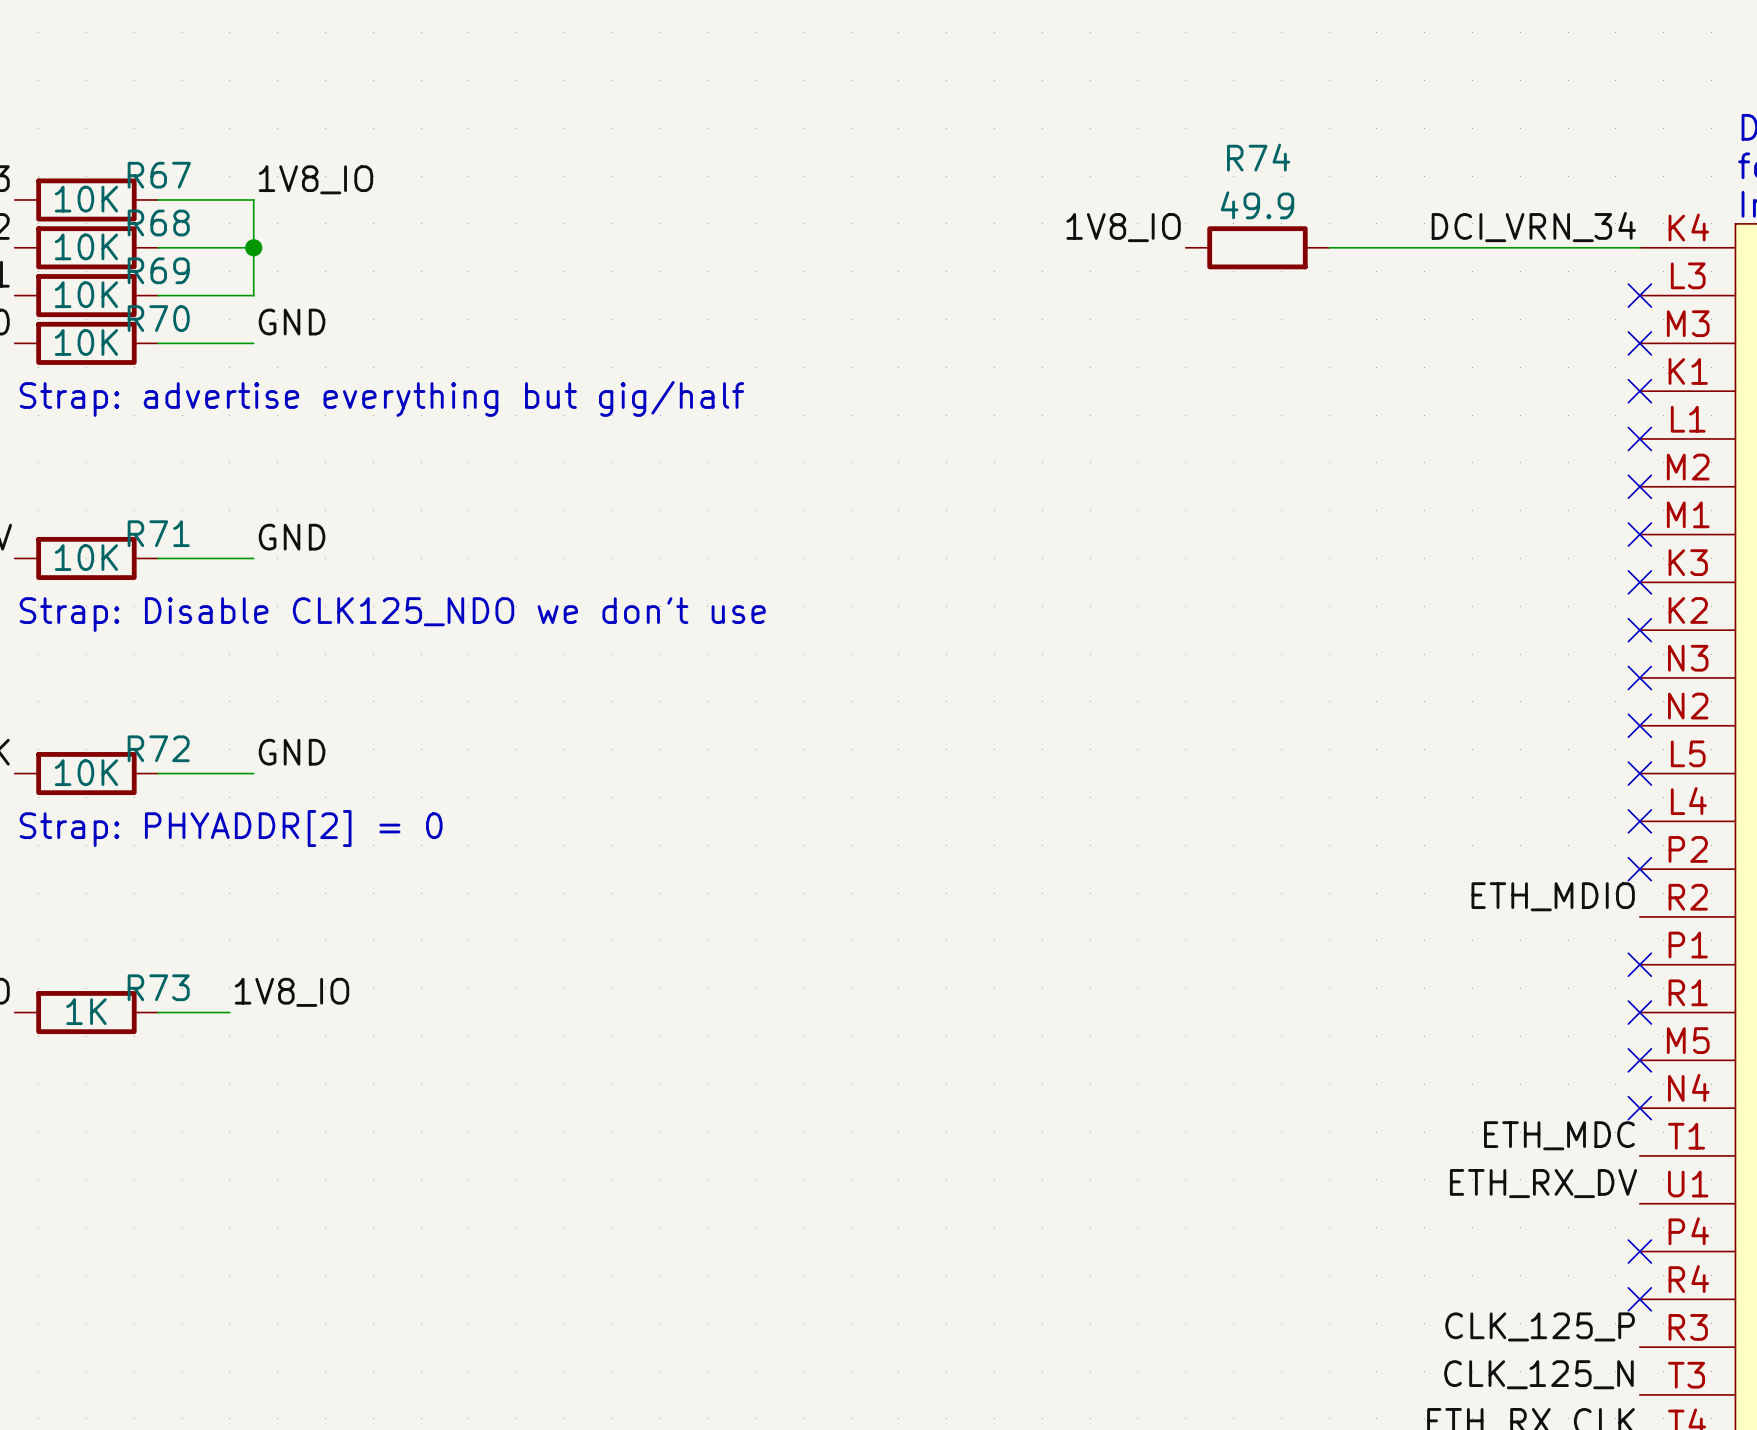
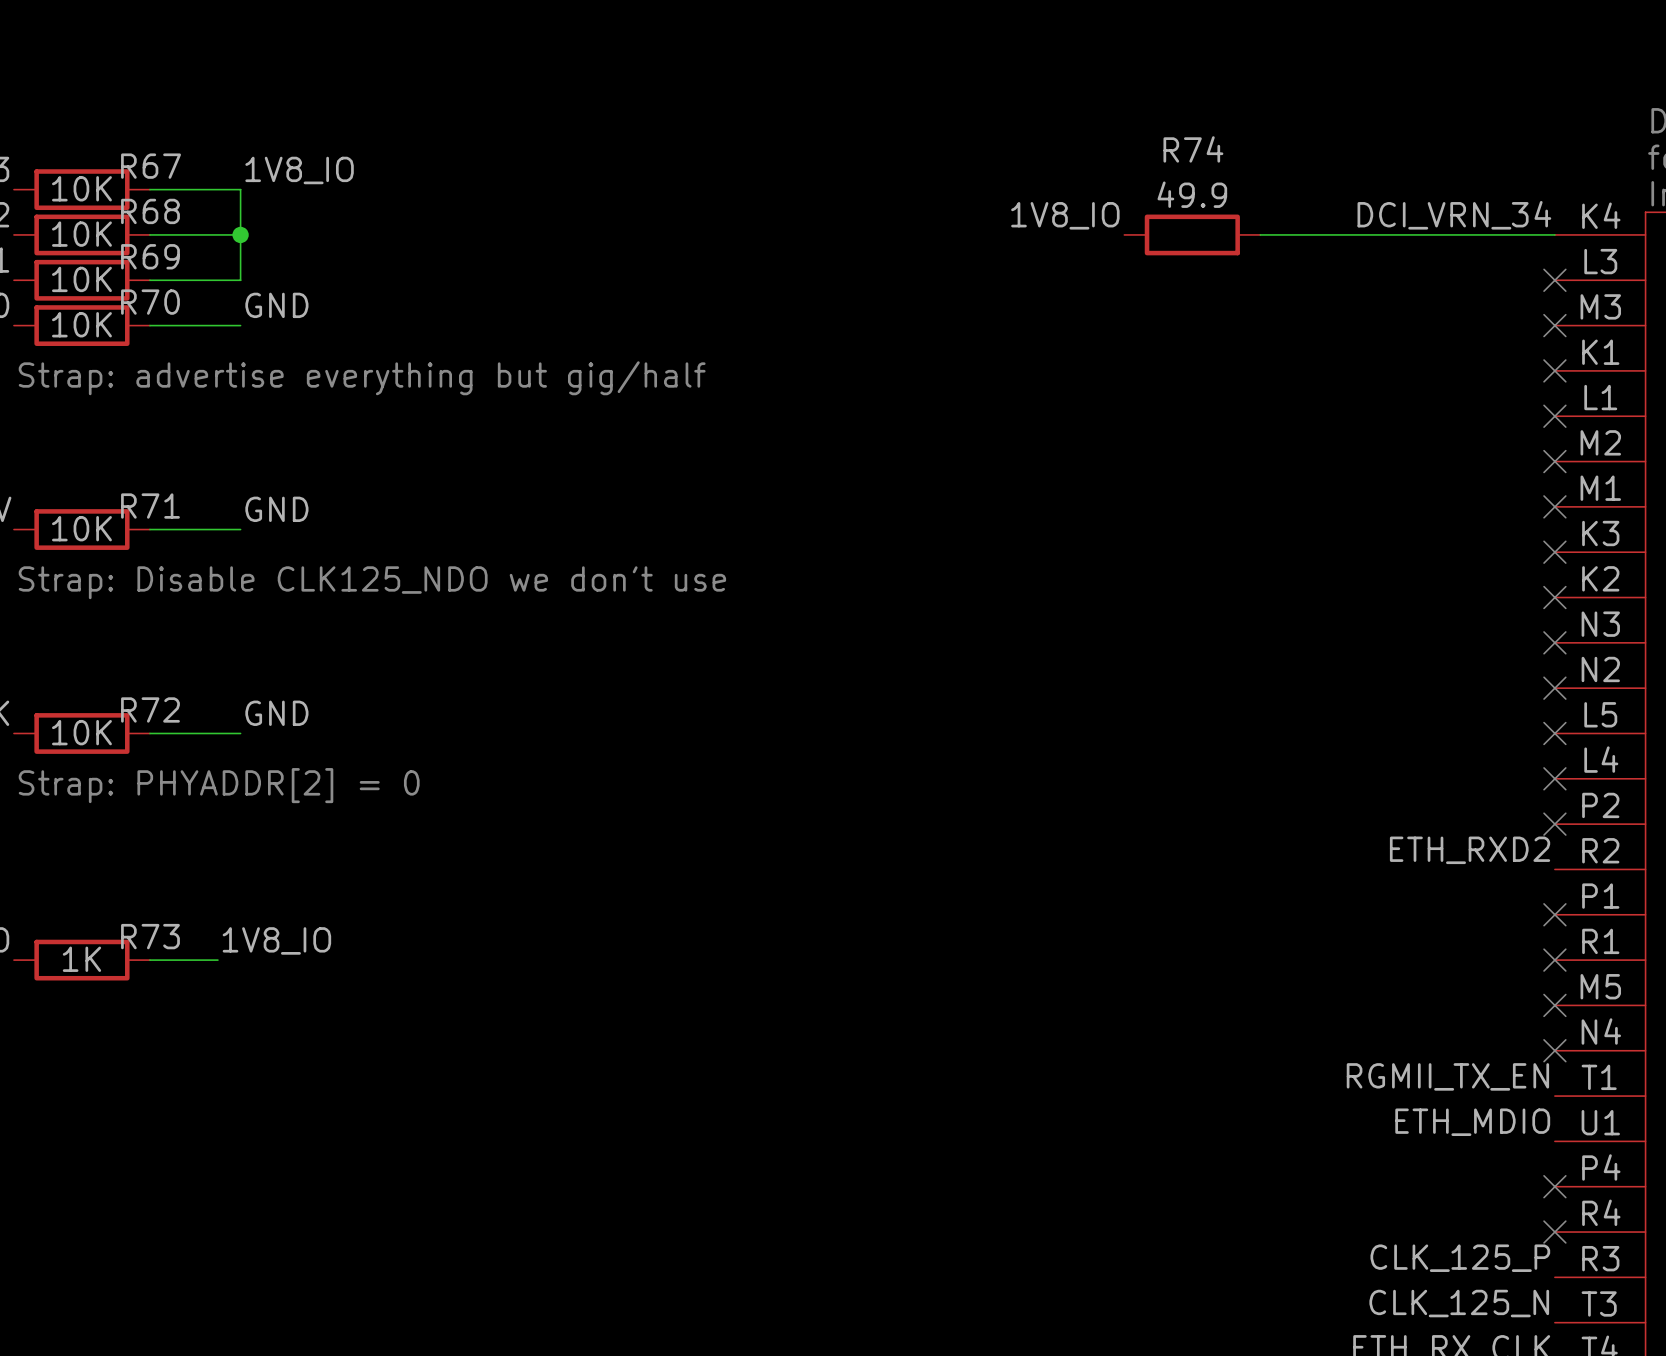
label: ETH_MDIO (1553, 896) -> ETH_RXD2 (1470, 850)
label: ETH_MDC (1559, 1135) -> RGMII_TX_EN (1447, 1076)
label: ETH_RX_DV (1543, 1183) -> ETH_MDIO (1472, 1122)

